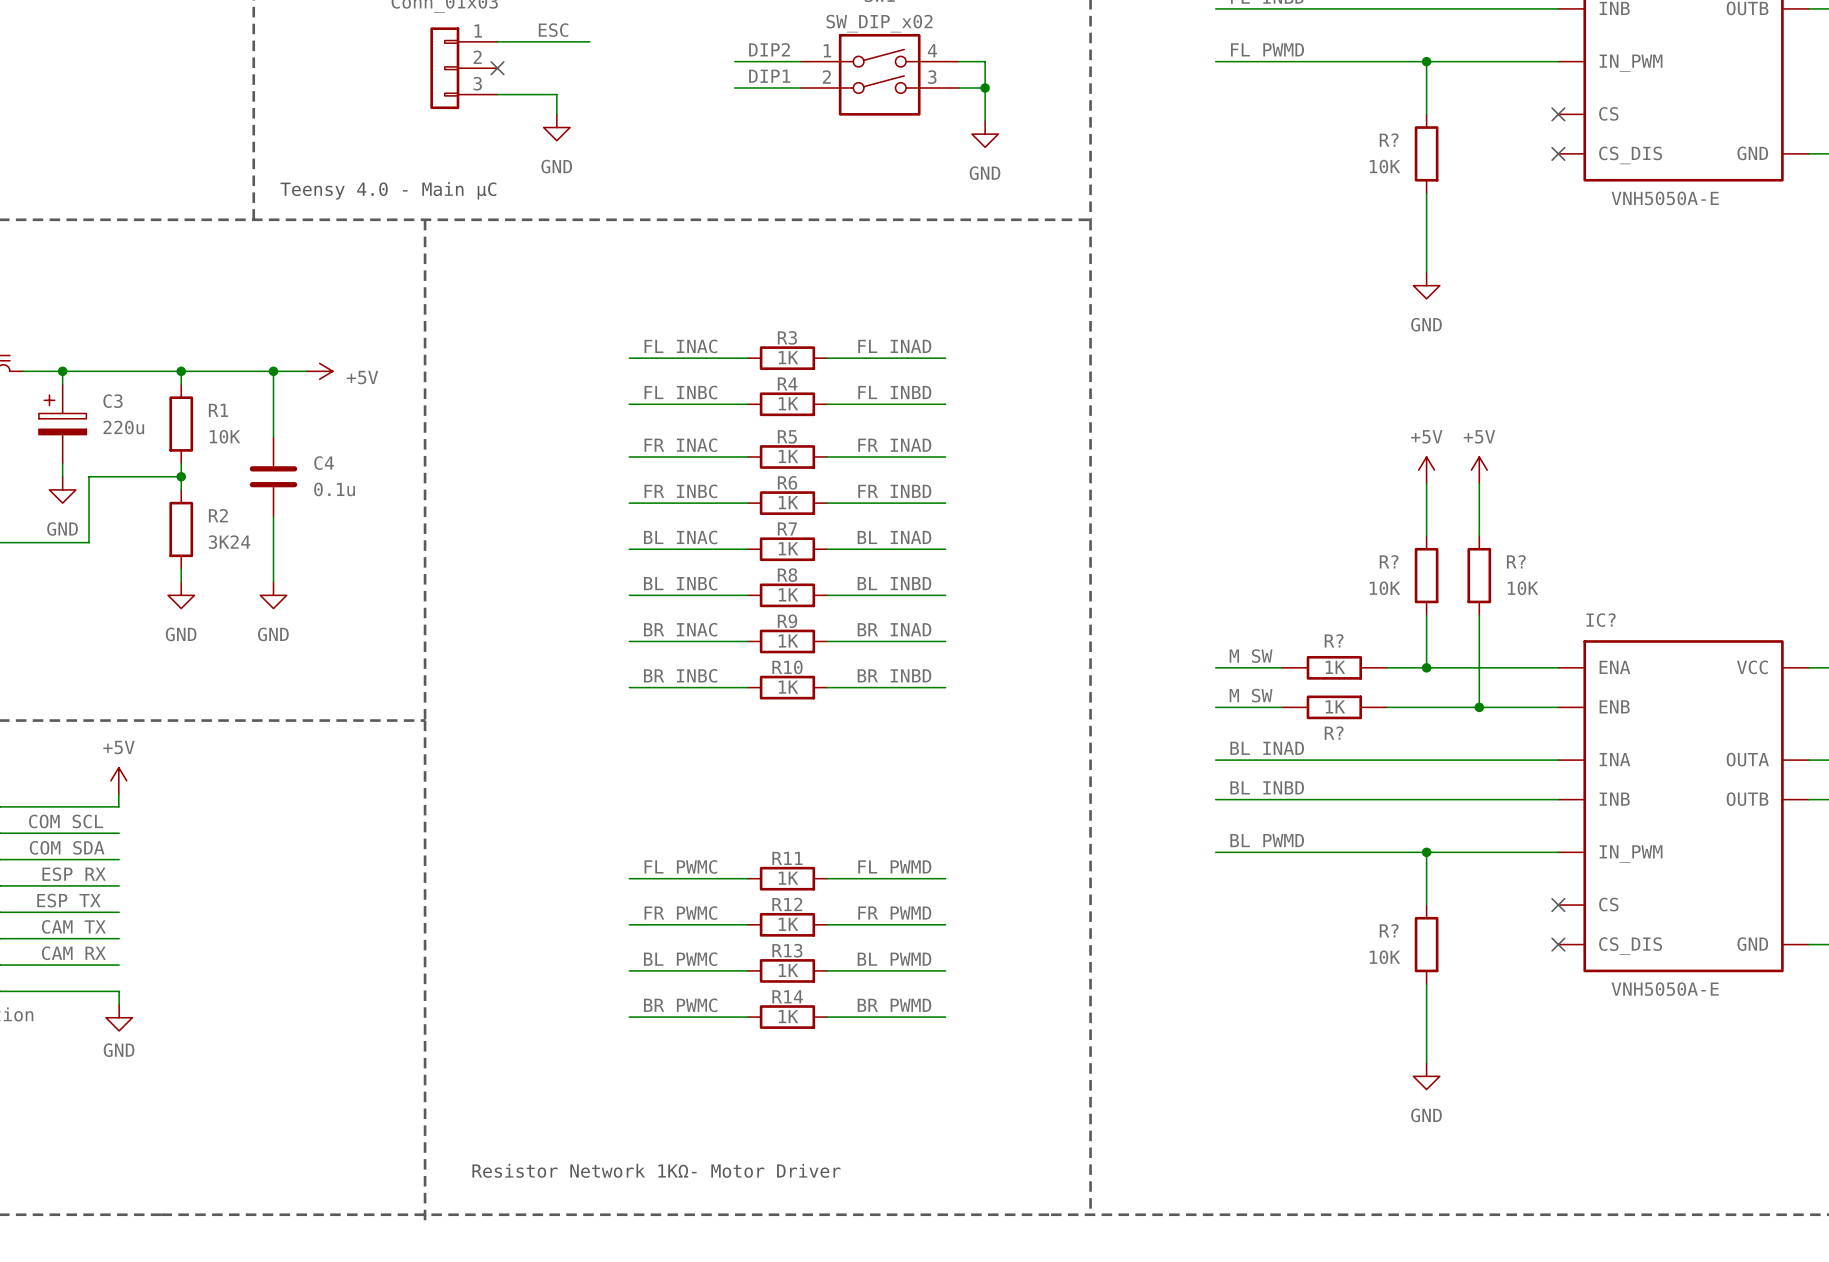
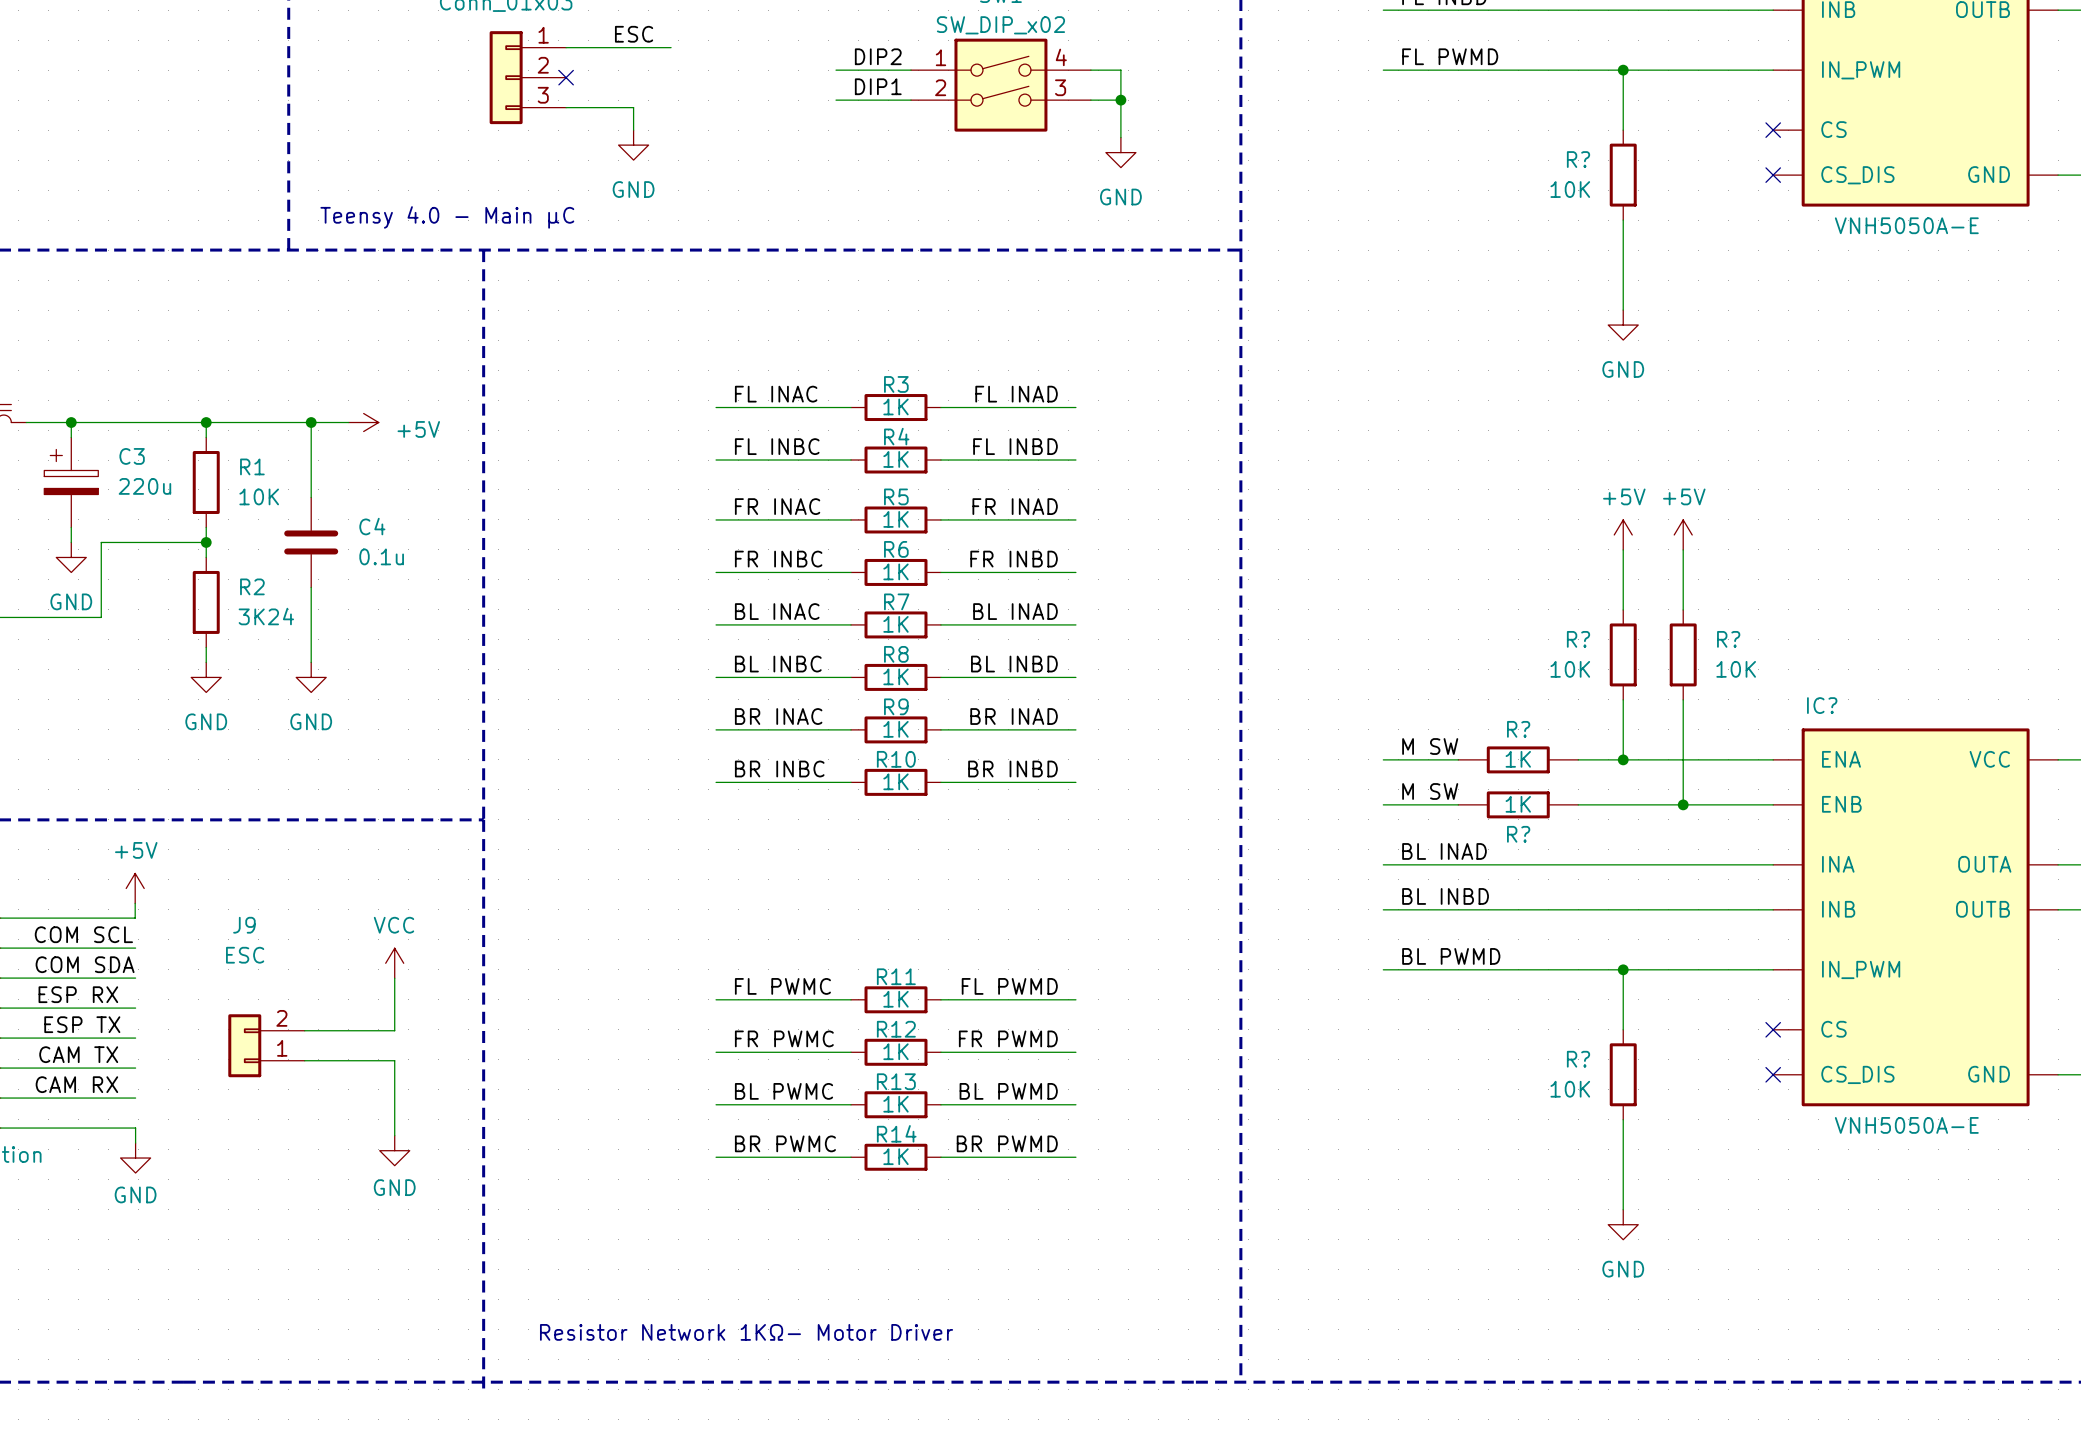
power symbol: none -> VCC (394, 963)
wire: none -> (394, 978) (394, 1030) (304, 1030)
J9: none -> ESC (266, 1045)
wire: none -> (304, 1060) (394, 1060) (394, 1135)
power symbol: none -> GND (394, 1150)

